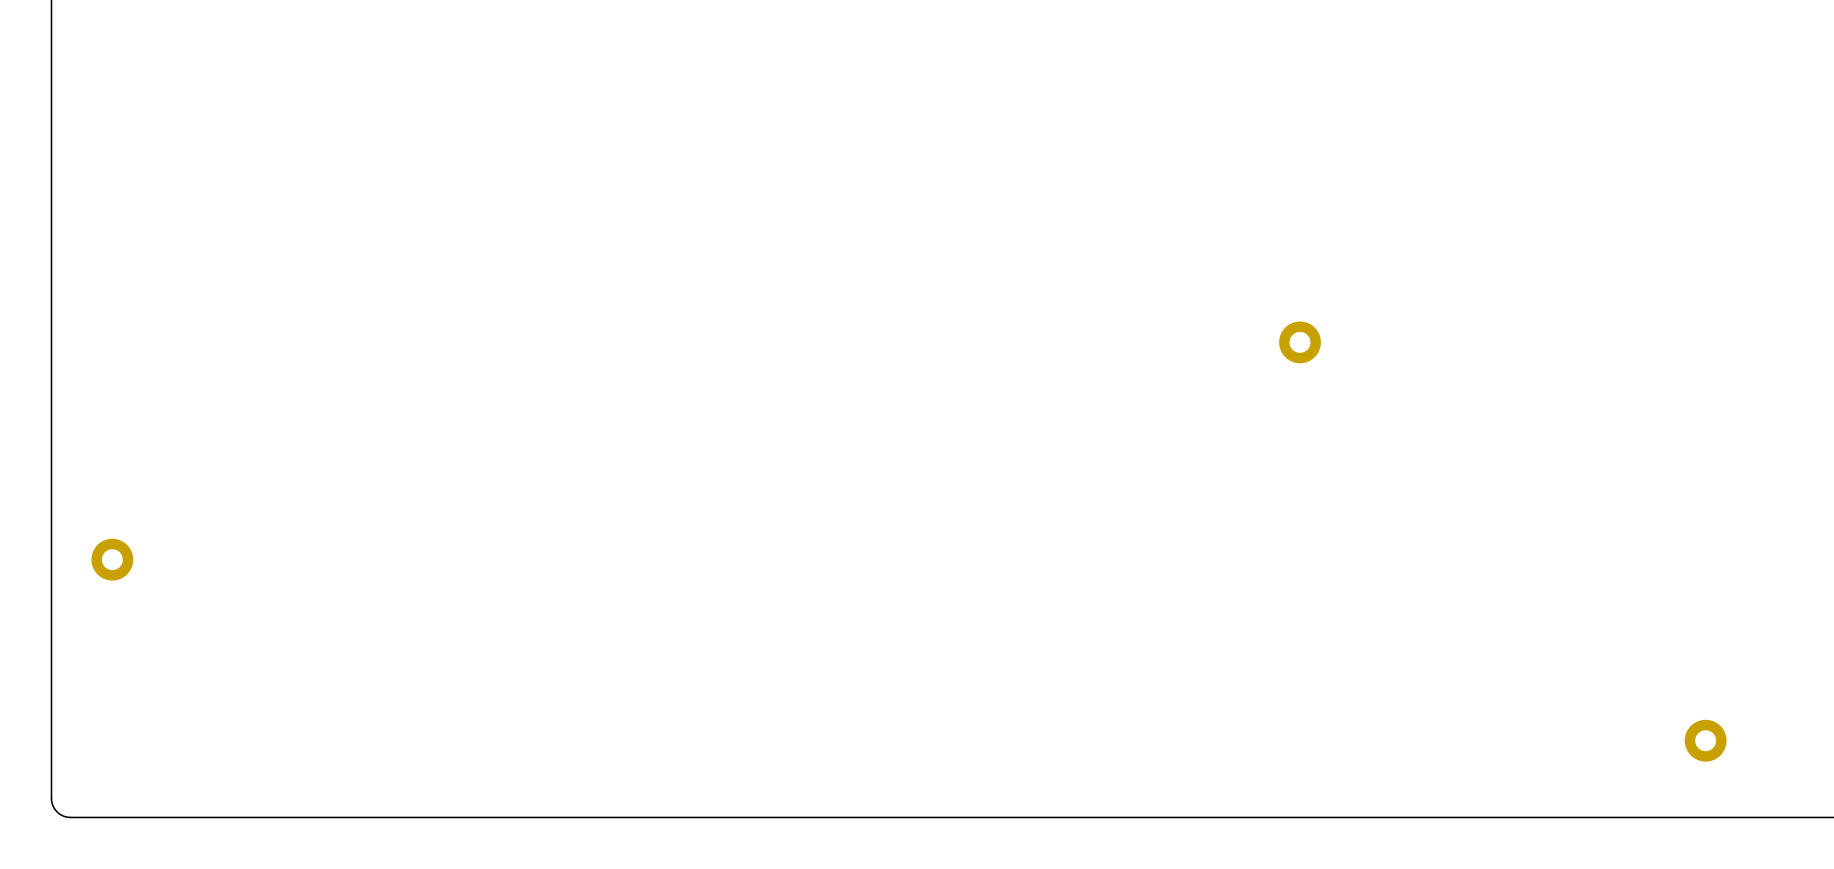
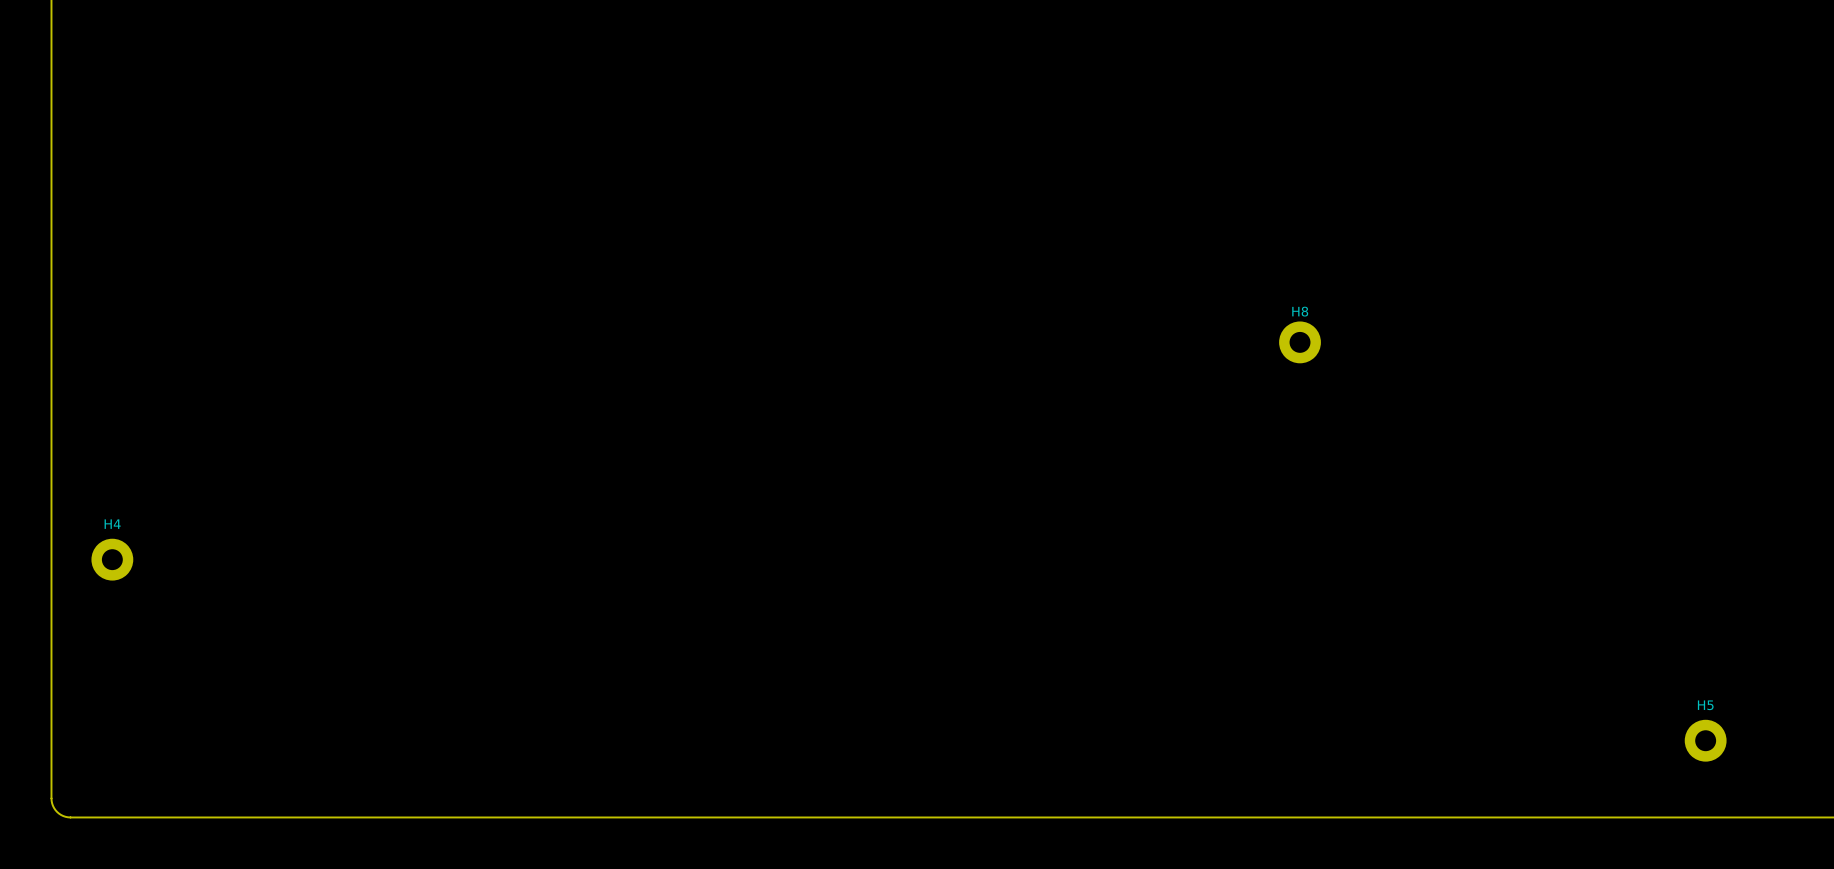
H8 name: none -> H8 (1300, 311)
H4 name: none -> H4 (112, 524)
H5 name: none -> H5 (1705, 705)

